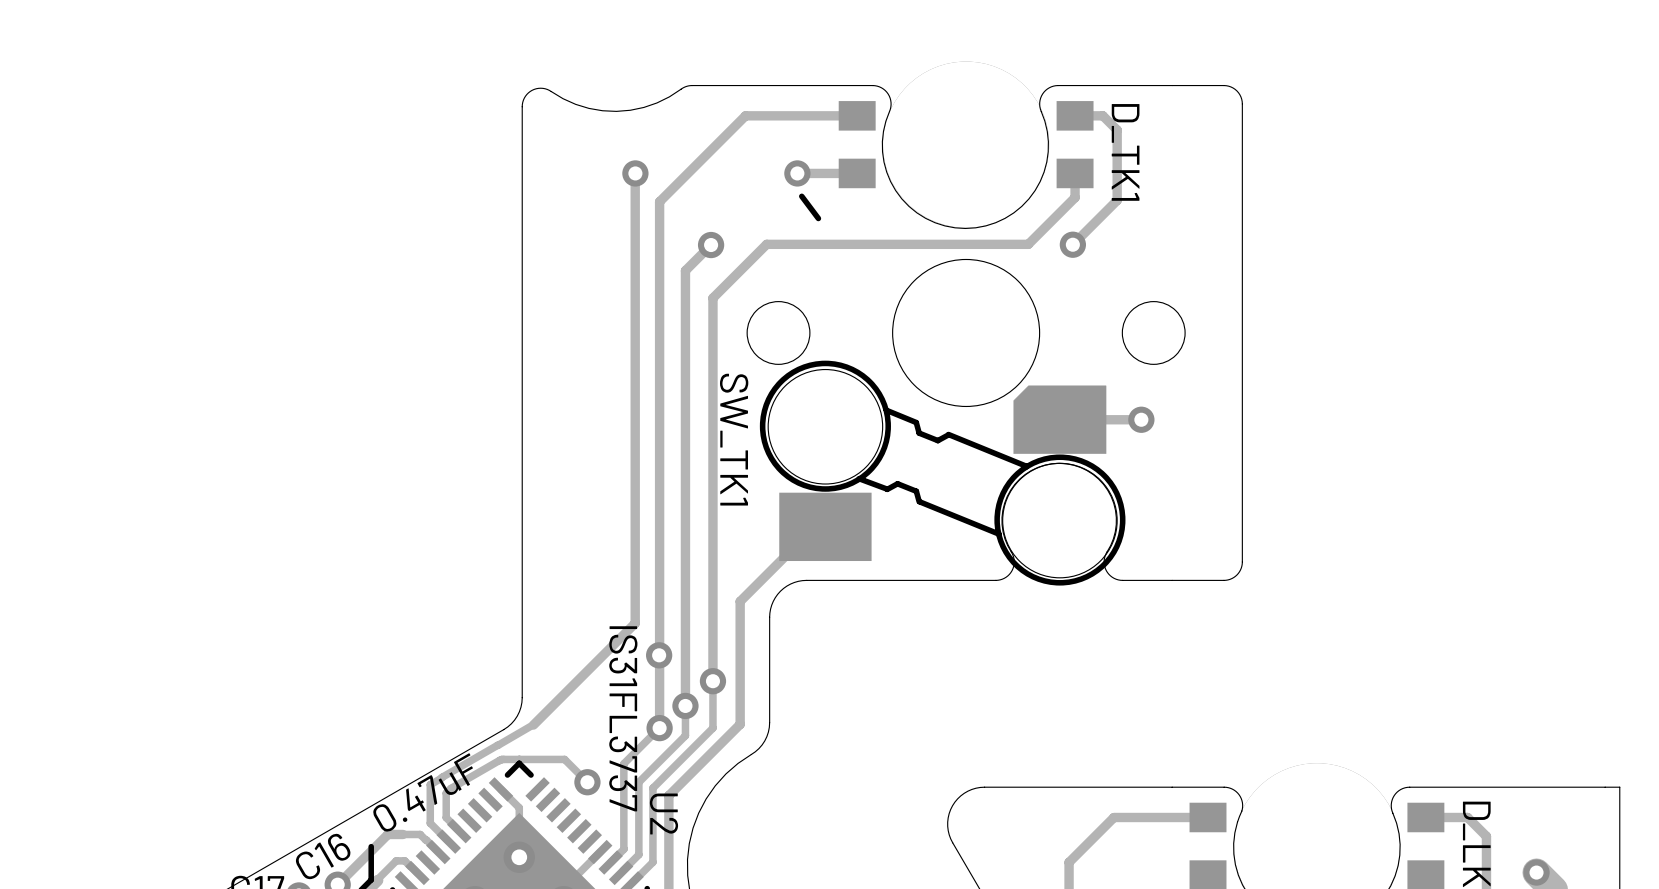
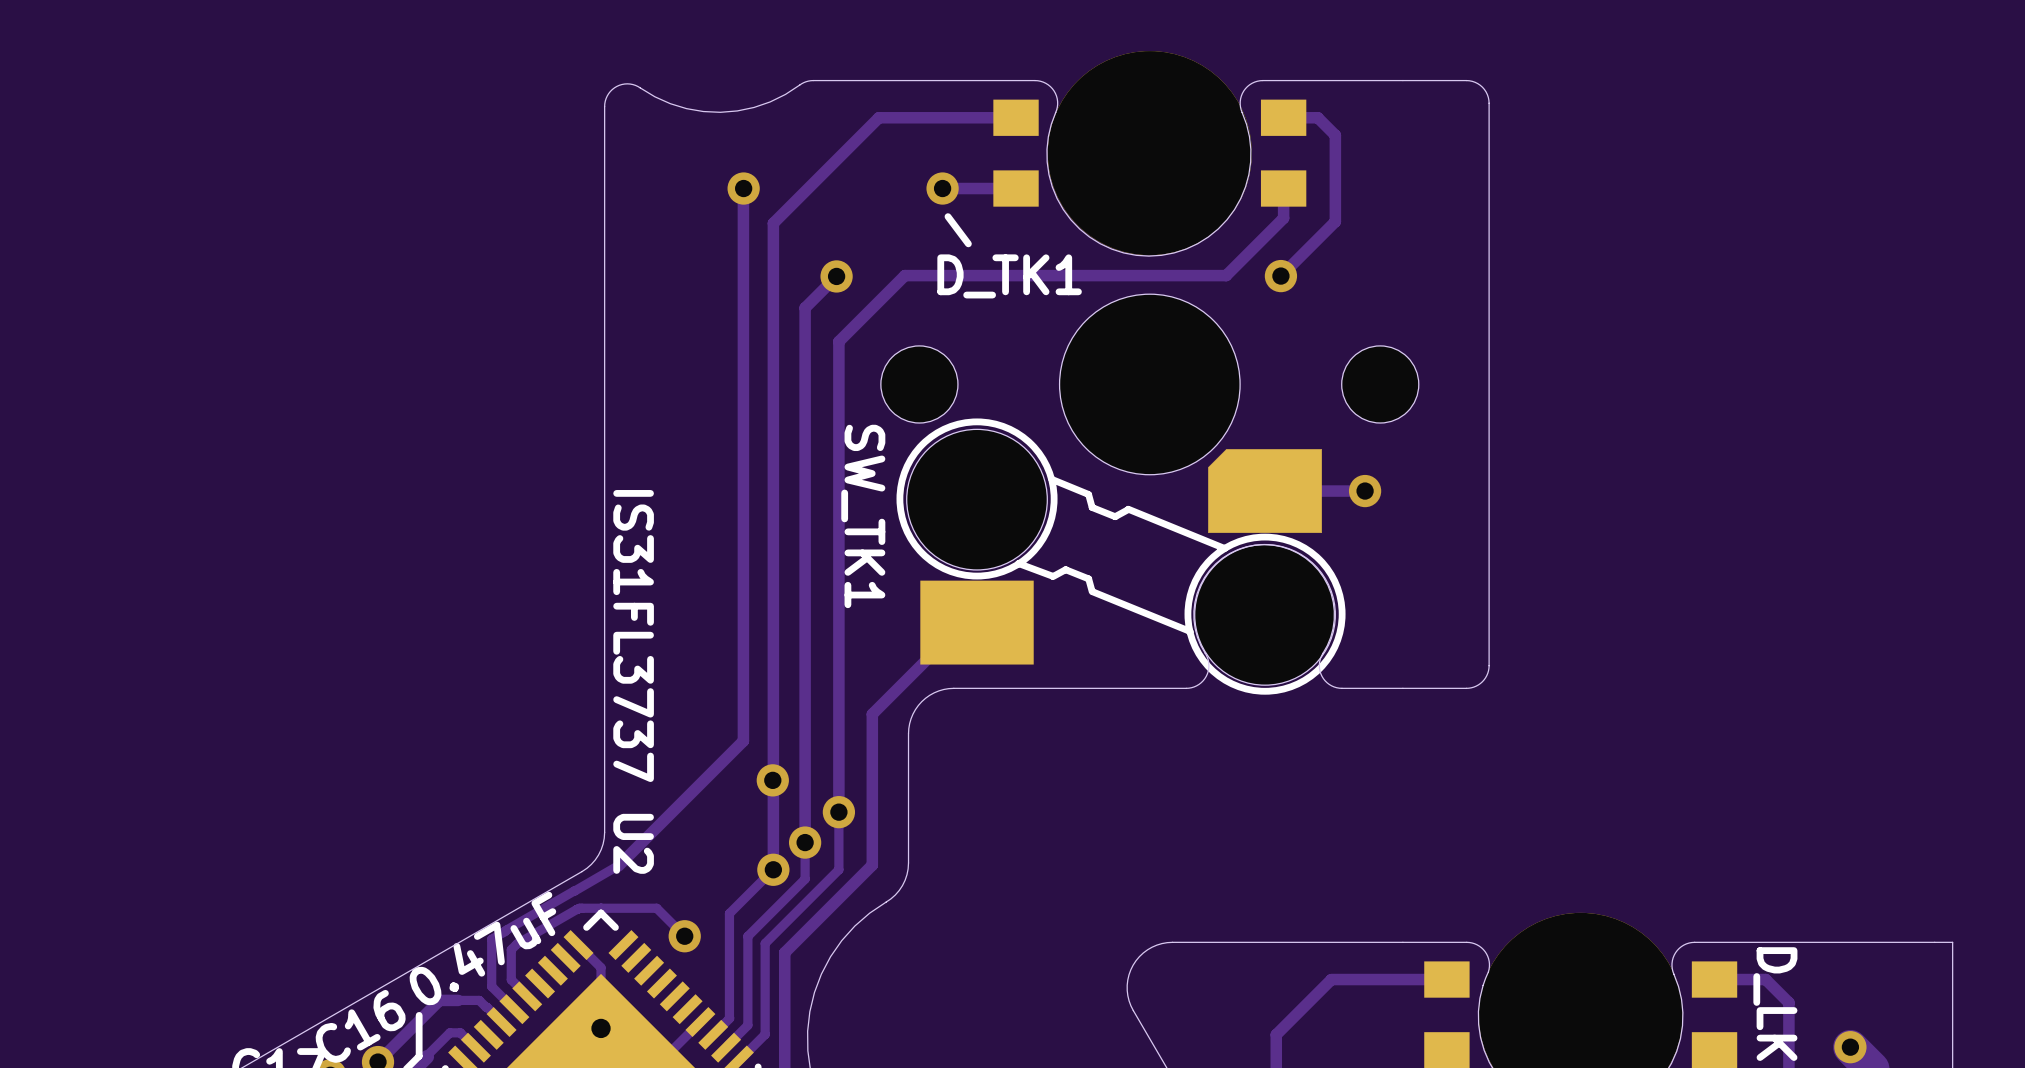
D_TK1 name rotation: 0° (1125, 152) -> 90° counterclockwise (1009, 276)
D_TK1 name position: D_TK1 (1125, 152) -> D_TK1 (1009, 276)
U2 value position: IS31FL3737 (623, 718) -> IS31FL3737 (633, 636)
U2 name position: U2 (663, 813) -> U2 (633, 843)

